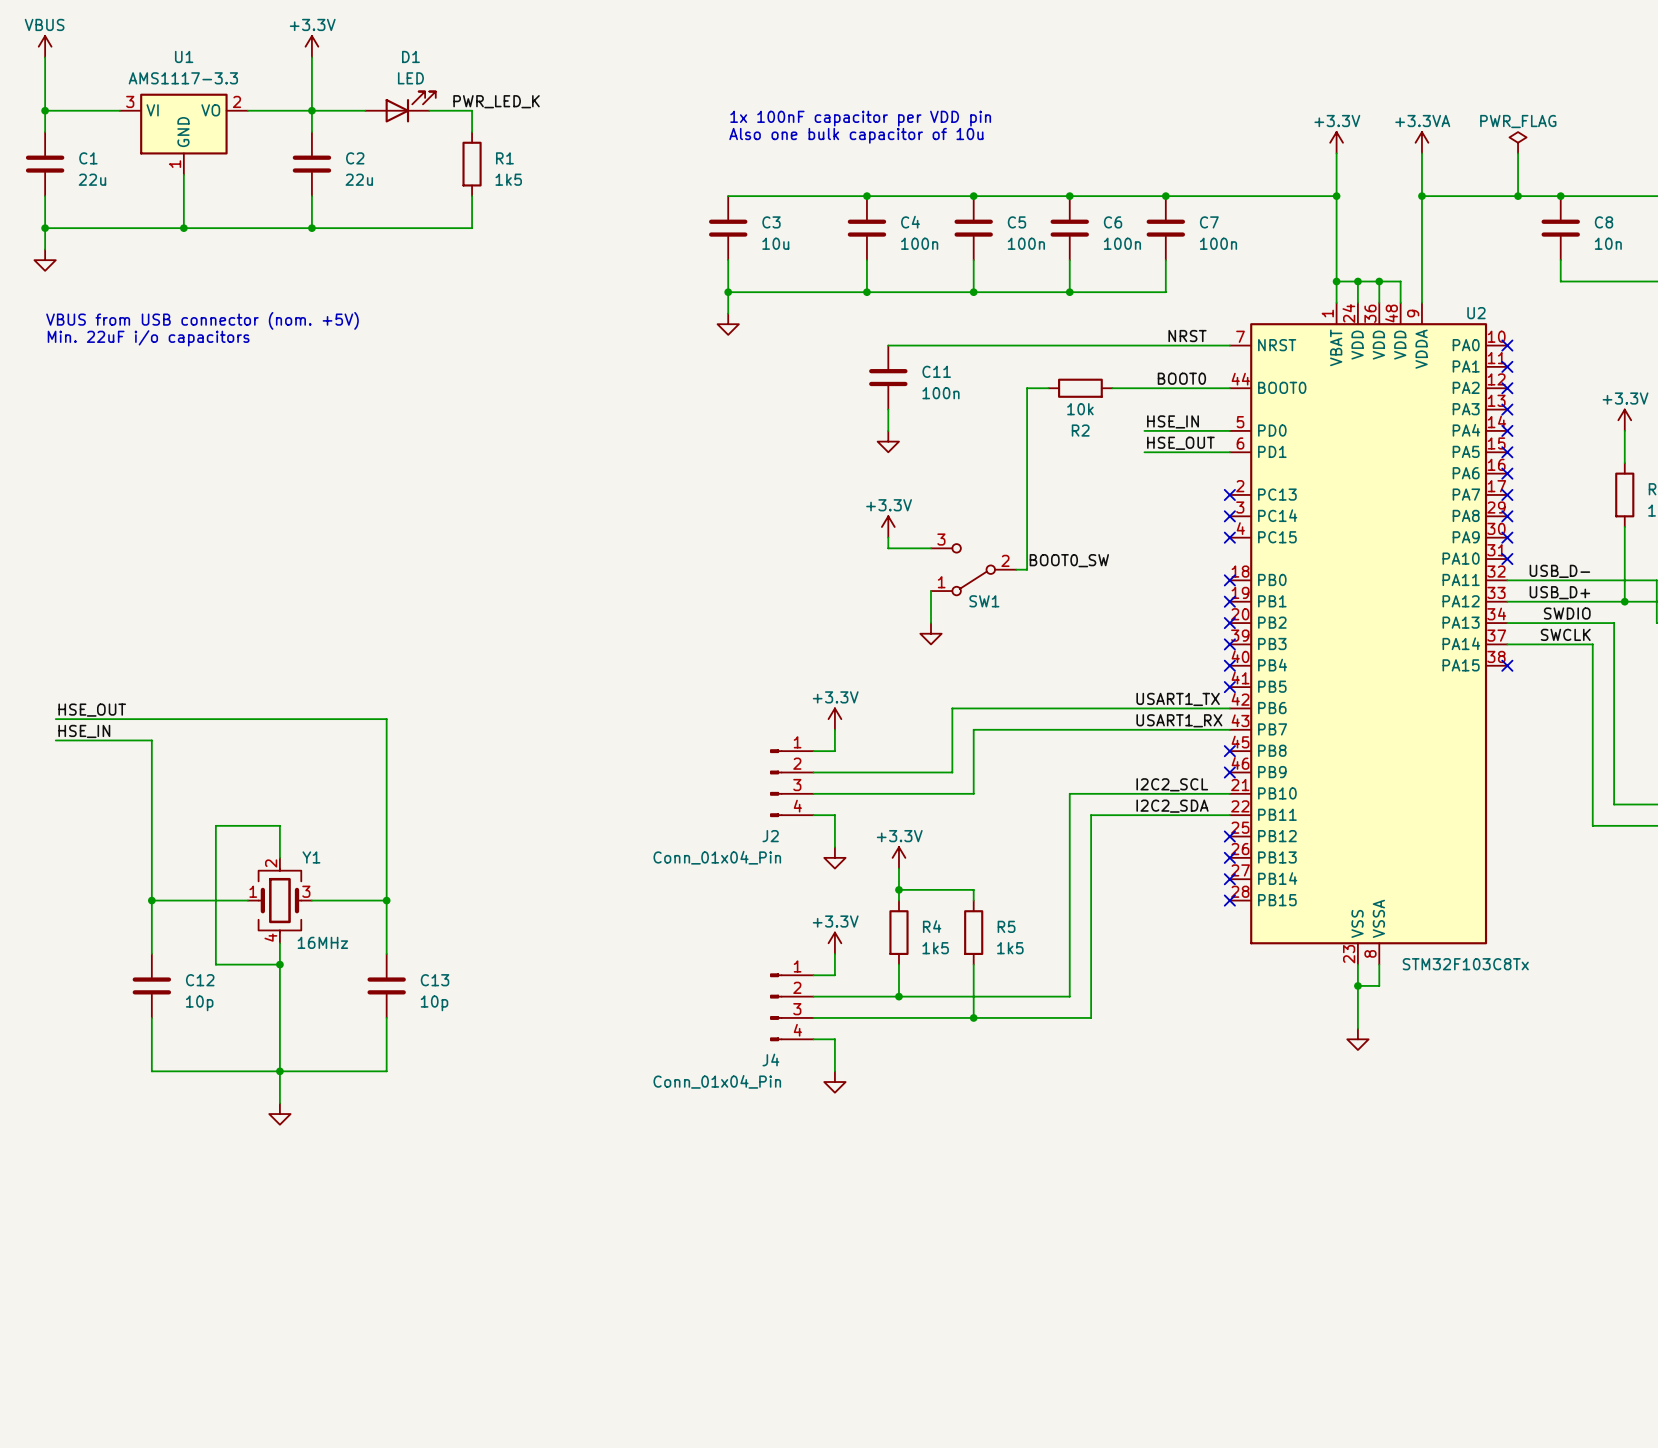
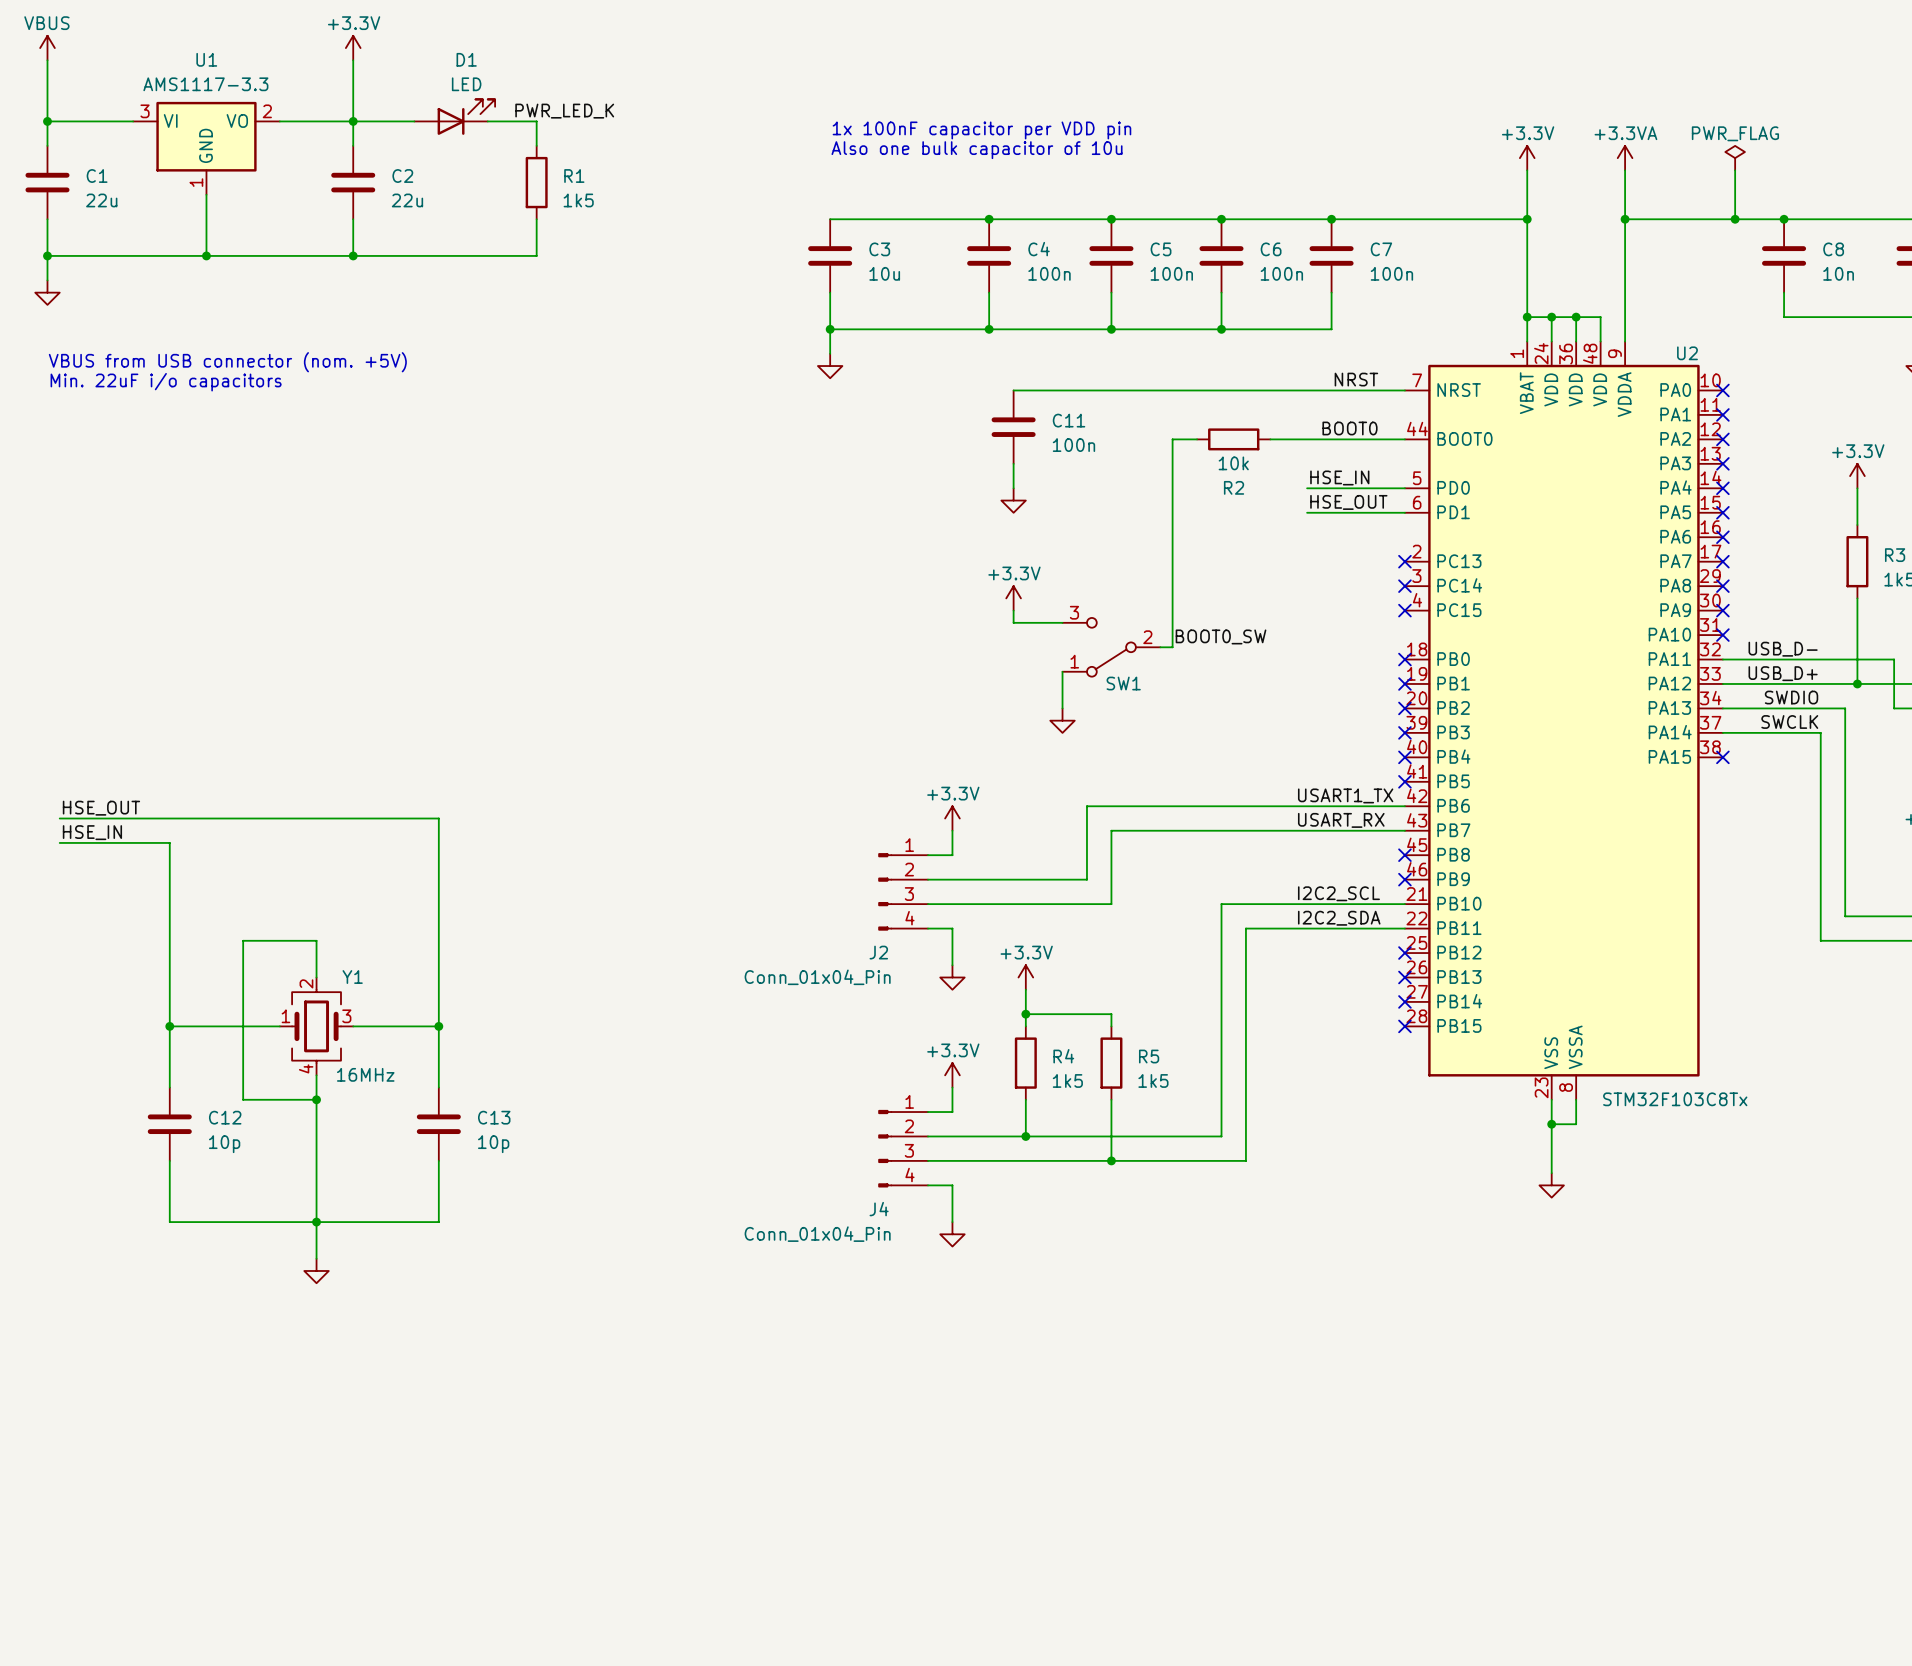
label: USART1_RX (1179, 720) -> USART_RX (1341, 820)

